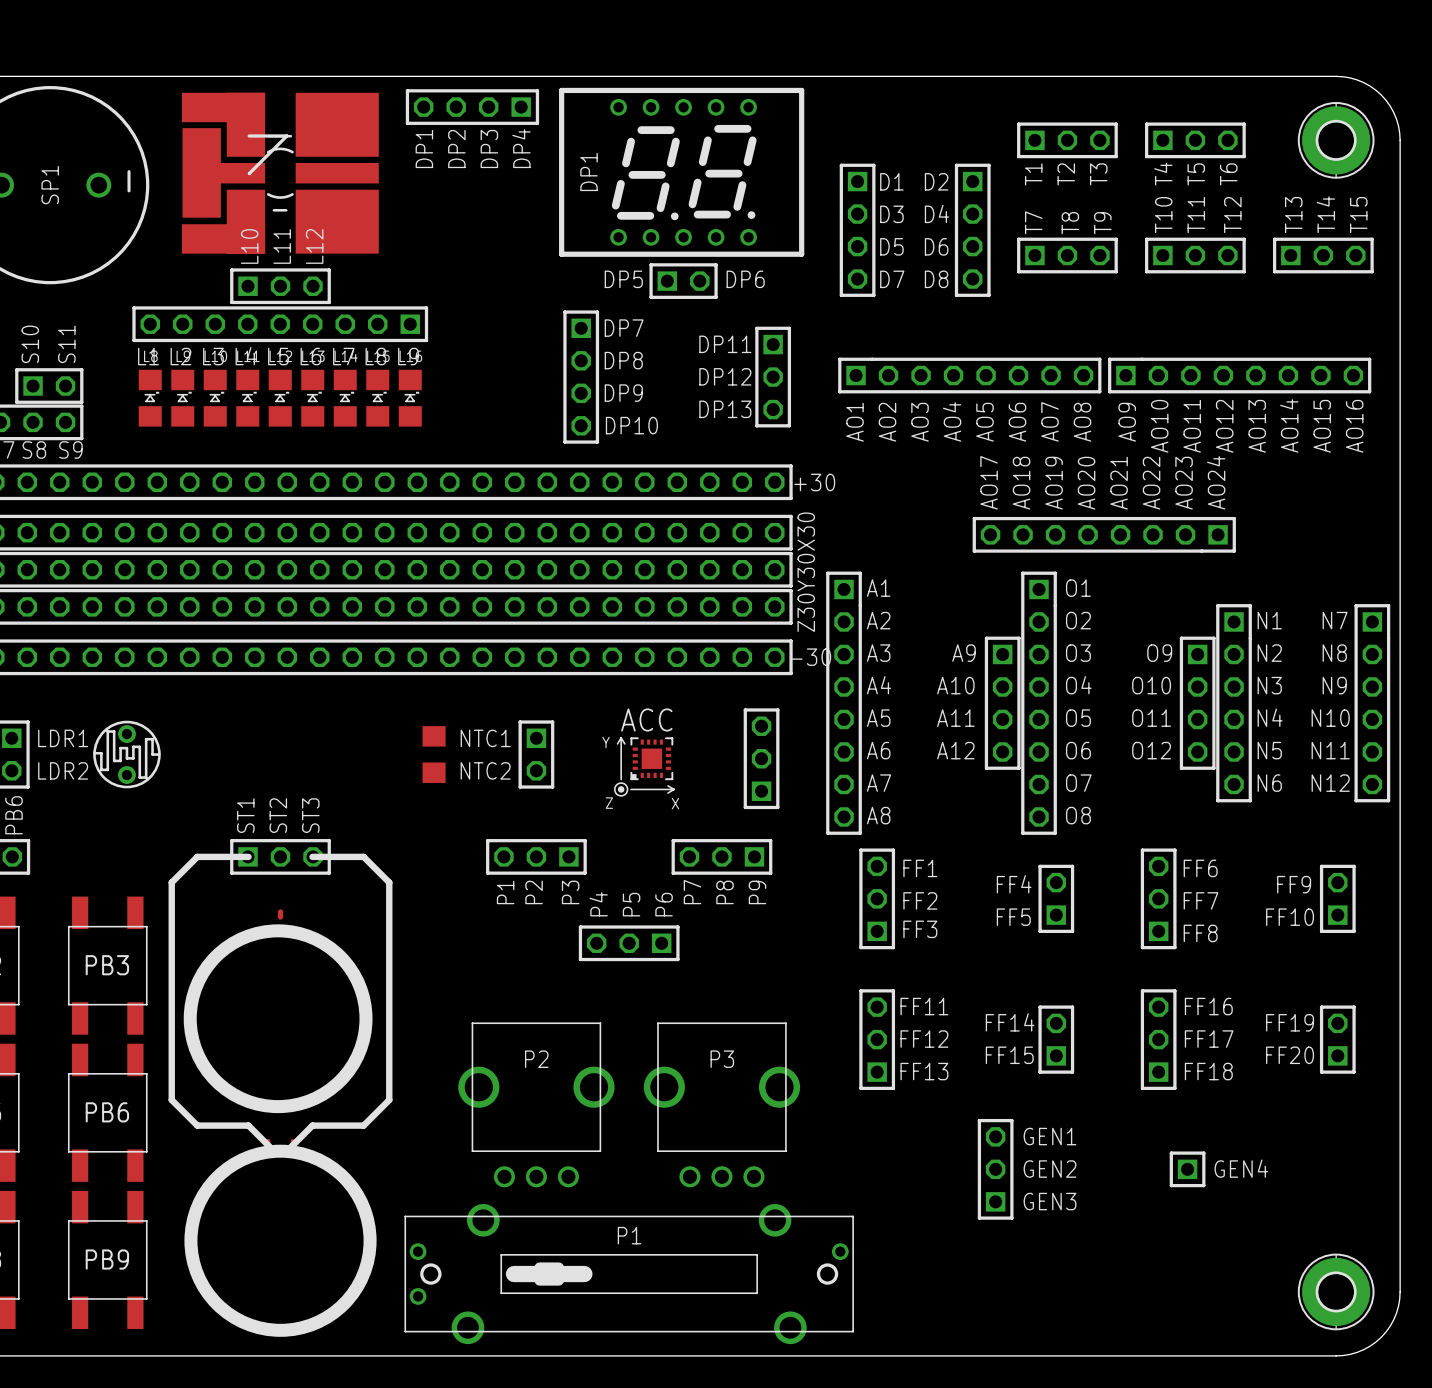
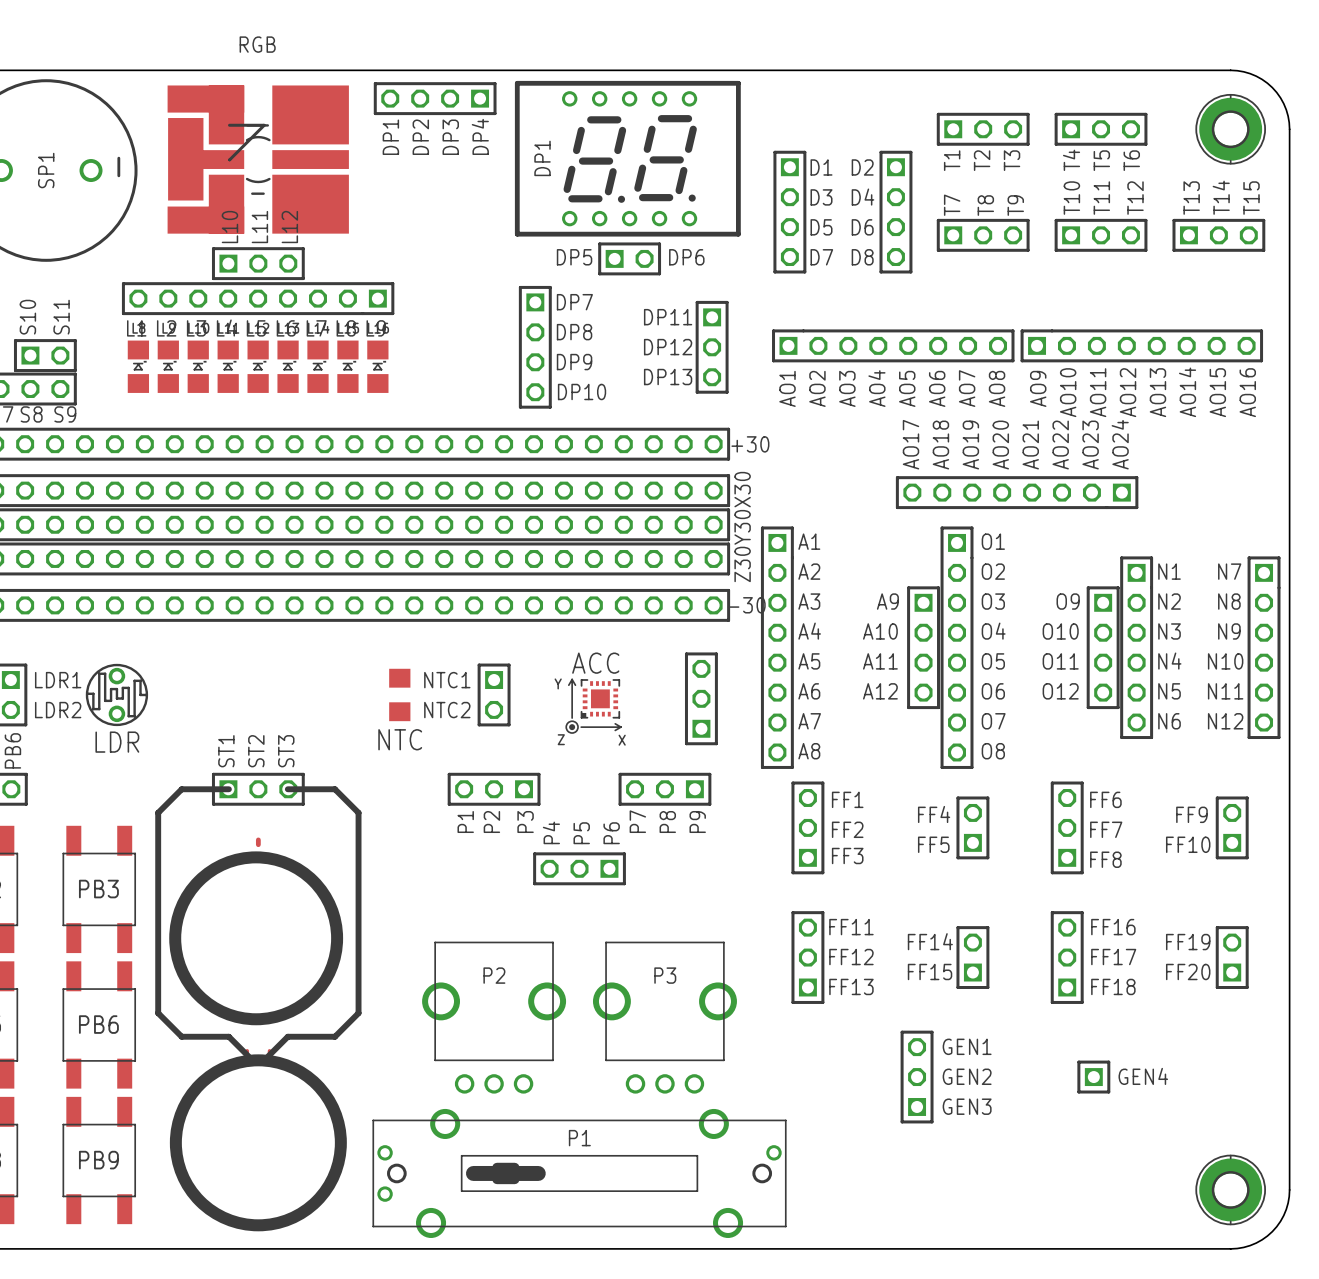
RGB name: none -> RGB (257, 44)
text: none -> NTC (400, 739)
LDR name: none -> LDR (117, 742)

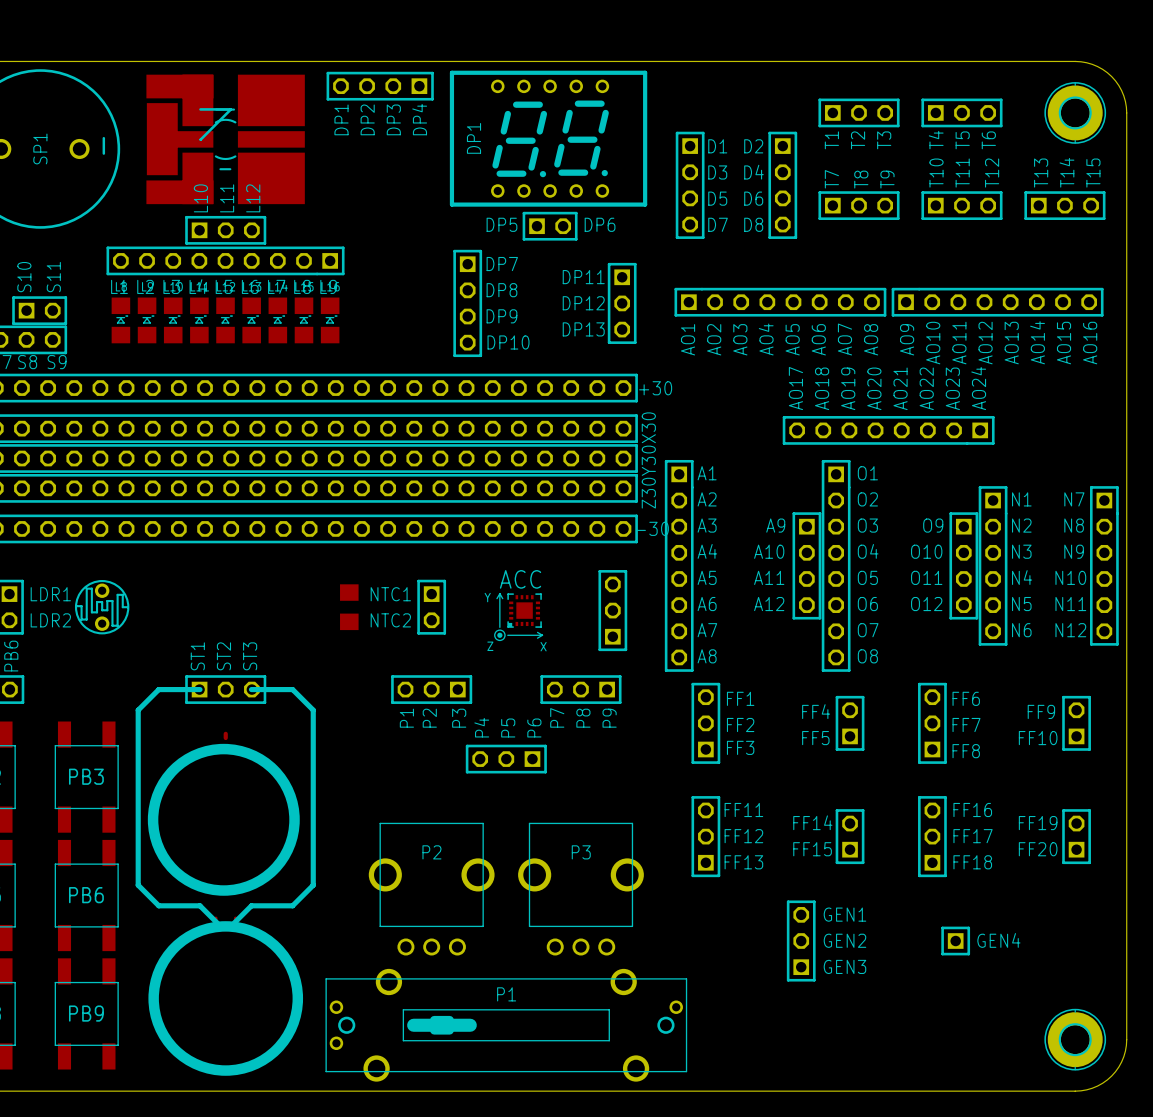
RGB name: RGB (257, 44) -> none
text: NTC (400, 739) -> none
LDR name: LDR (117, 742) -> none

